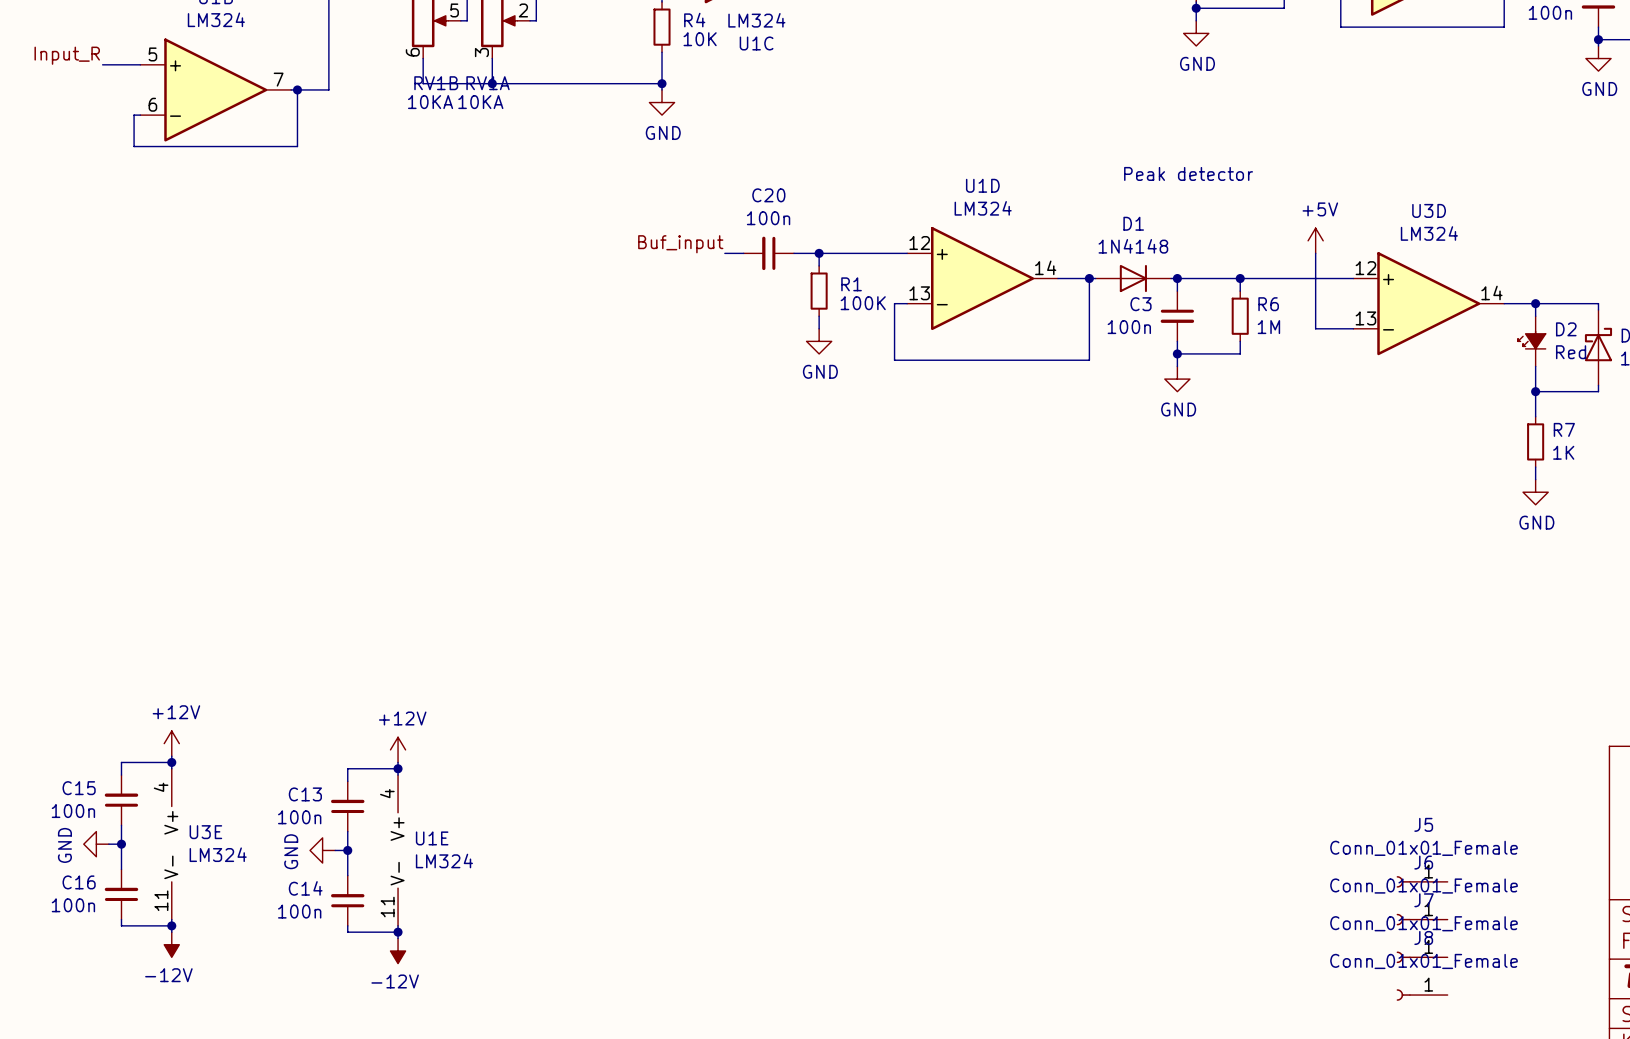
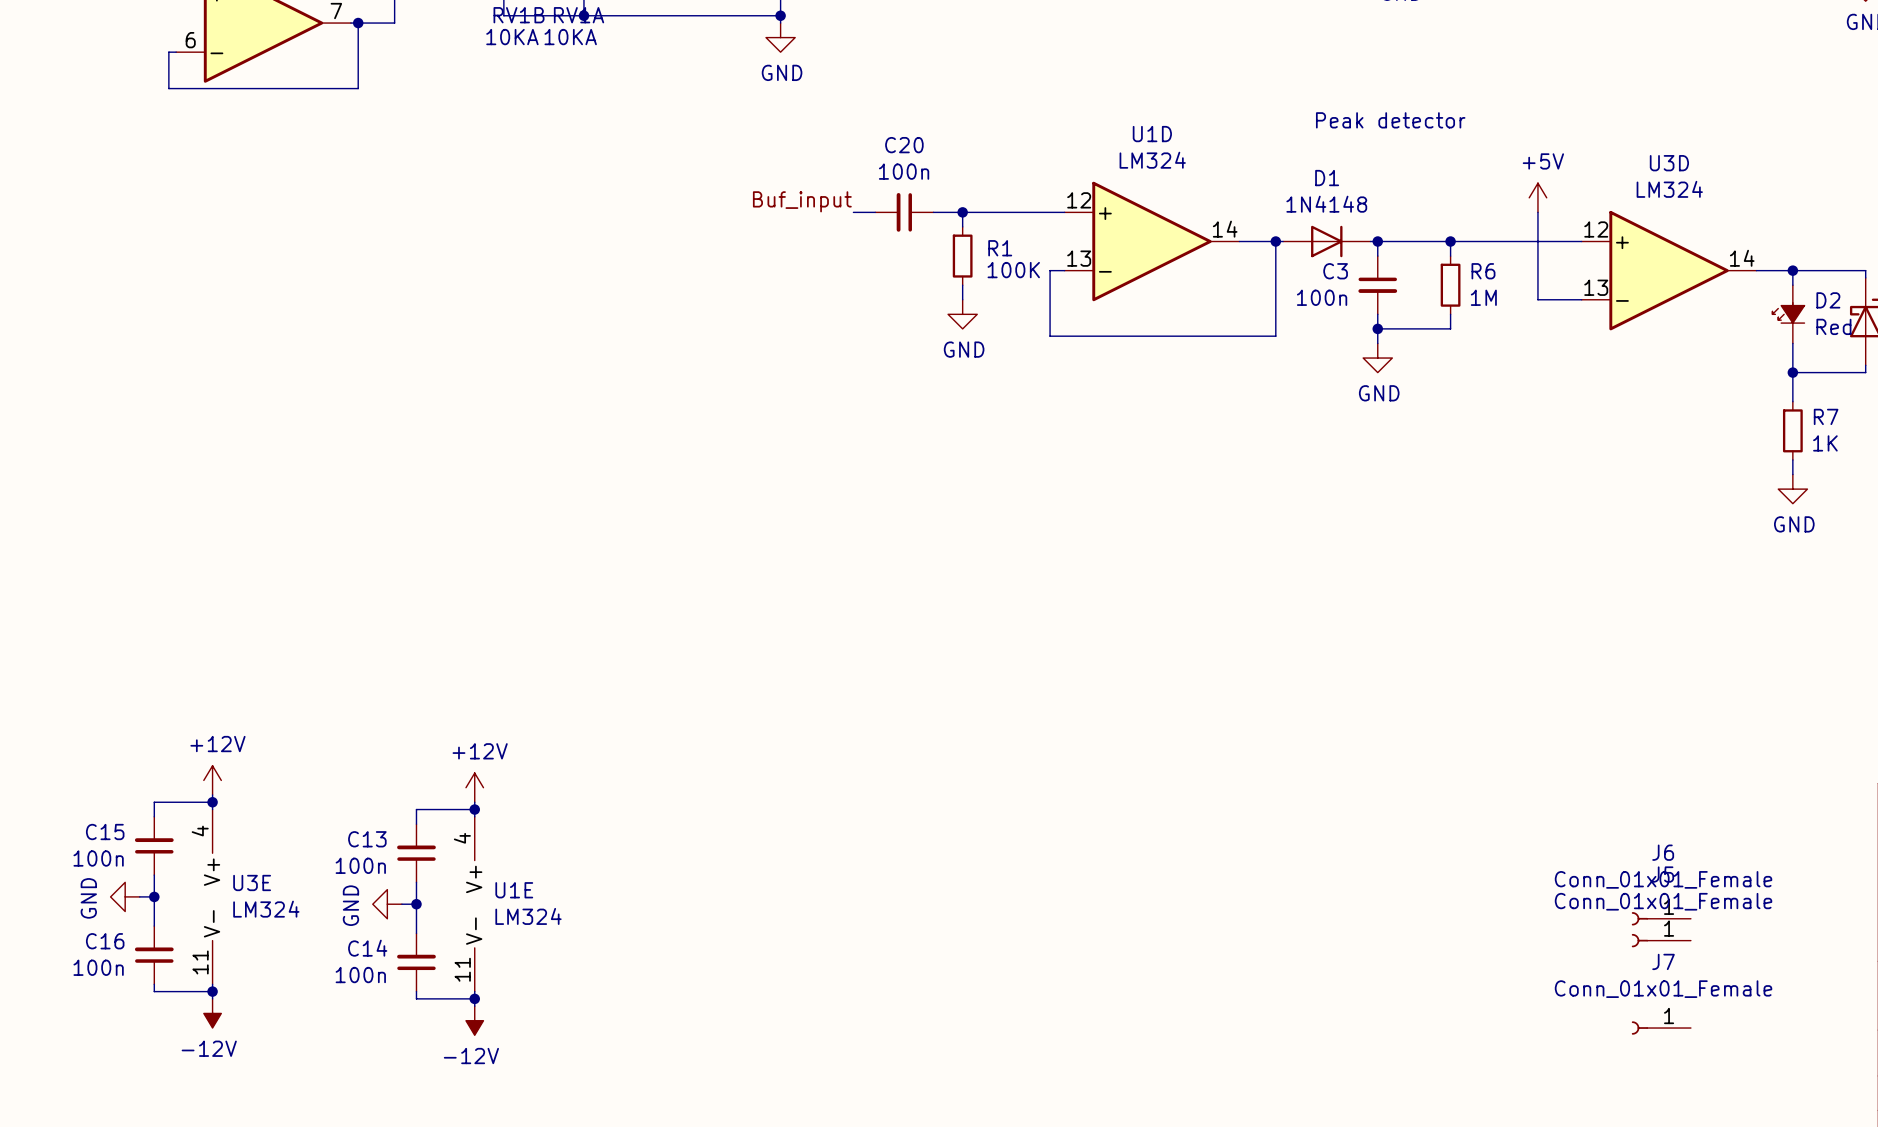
J6 position: (1422, 919) -> (1661, 918)
J8: Conn_01x01_Female (1422, 995) -> none

